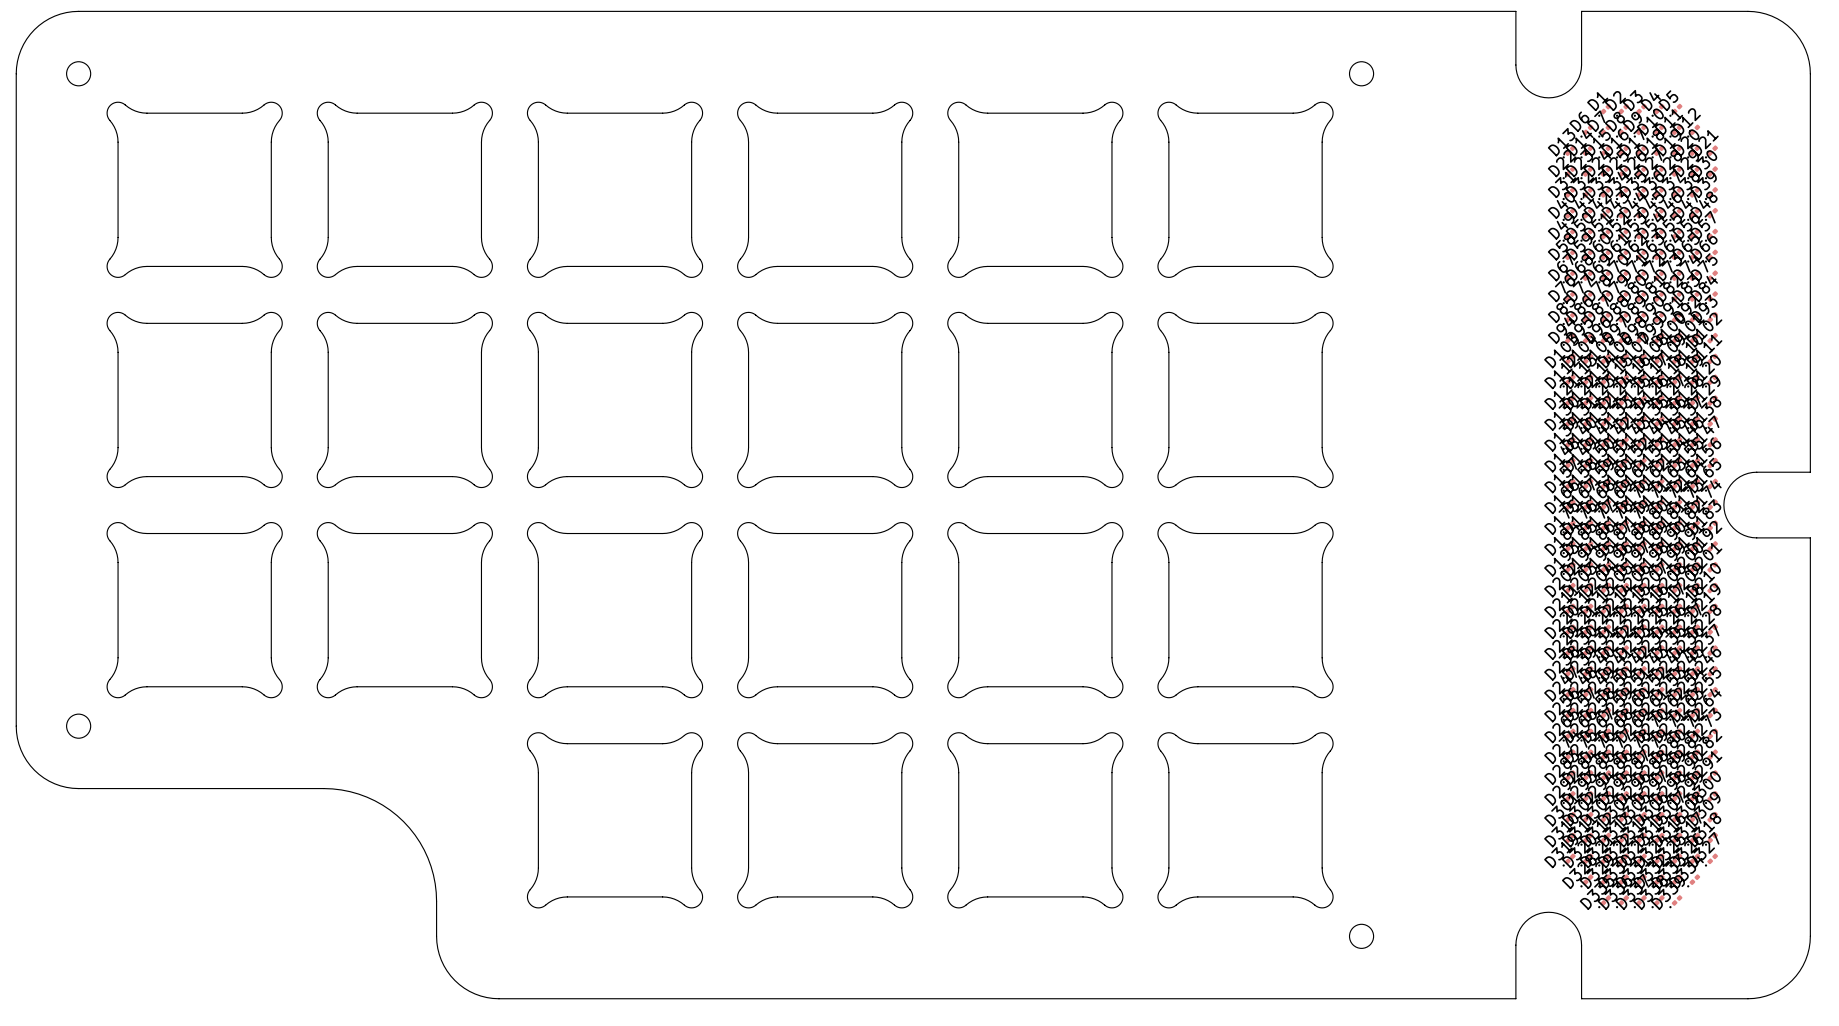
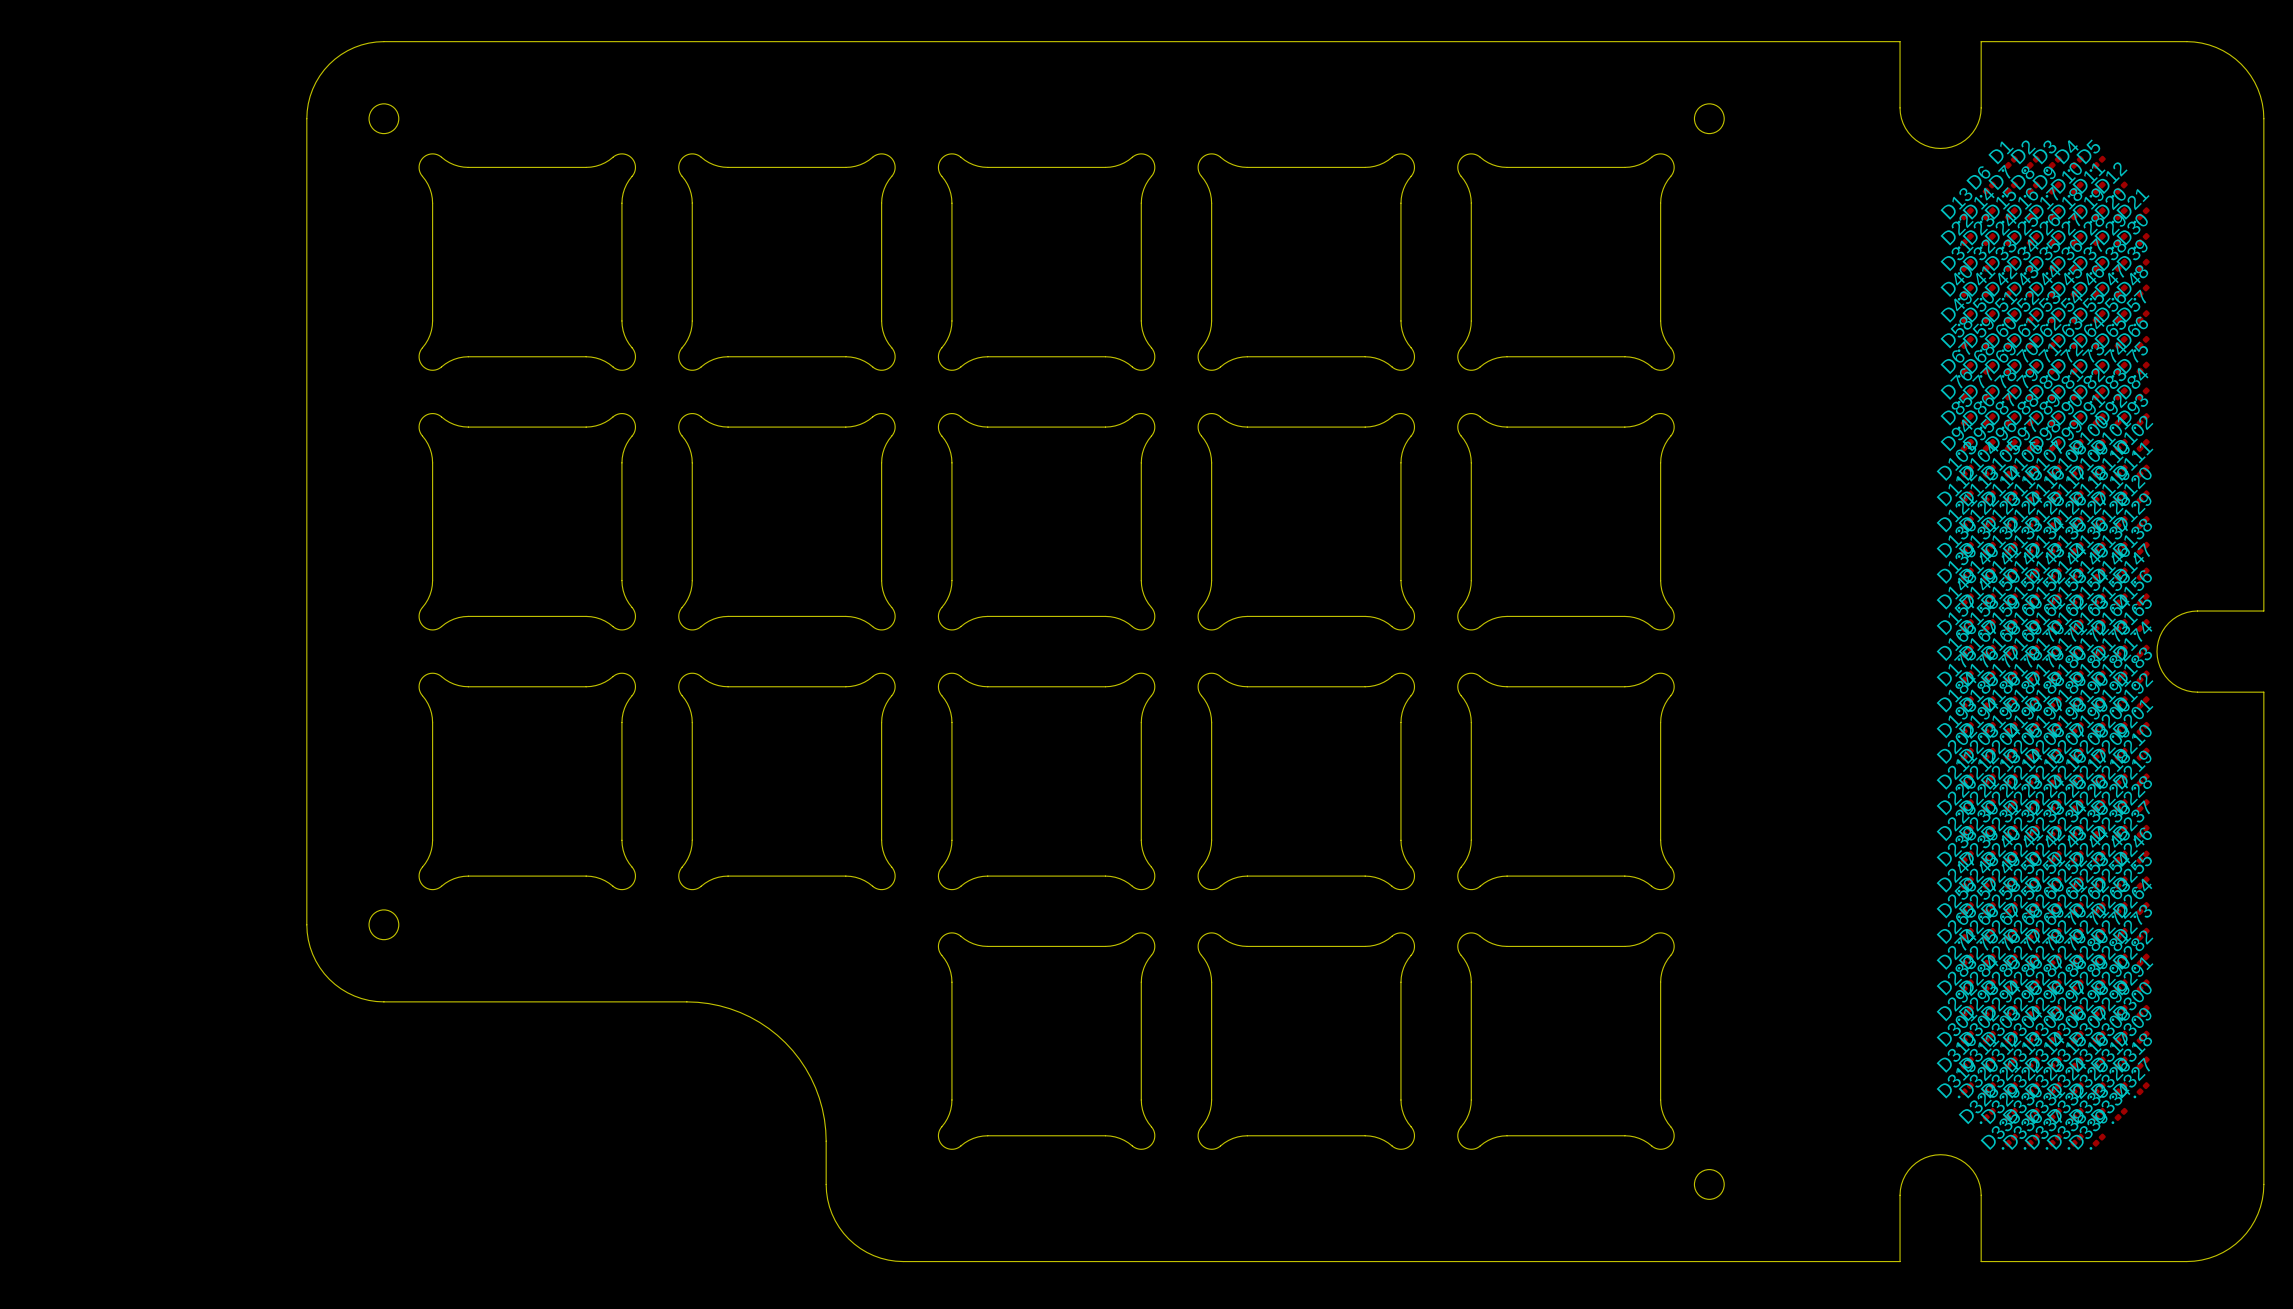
board edge: (288, 11) (66, 12) (49, 18) (30, 34) (20, 49) (16, 73) (16, 726) (20, 750) (26, 760) (39, 774) (54, 783) (72, 788) (288, 788) -> (383, 41) (354, 47) (329, 64) (312, 89) (306, 118) (307, 932) (315, 961) (335, 984) (361, 998) (383, 1001)
round board edge position: (78, 73) -> (383, 118)
board edge: (125, 104) (135, 111) (147, 113) (242, 113) (253, 111) (268, 102) (279, 105) (281, 115) (273, 130) (271, 142) (271, 237) (273, 249) (281, 264) (279, 274) (268, 277) (253, 268) (242, 266) (147, 266) (135, 268) (120, 277) (110, 274) (107, 264) (115, 249) (118, 237) (118, 142) (115, 130) (107, 112) (109, 106) (113, 103) (120, 102) (125, 104) -> none
board edge: (125, 315) (120, 312) (113, 313) (109, 316) (107, 323) (115, 340) (118, 352) (118, 447) (115, 459) (107, 474) (110, 484) (120, 487) (135, 478) (147, 476) (242, 476) (253, 478) (268, 487) (279, 484) (281, 474) (273, 459) (271, 447) (271, 352) (273, 340) (281, 325) (279, 315) (268, 312) (253, 321) (242, 323) (147, 323) (135, 321) (125, 315) -> none
board edge: (125, 525) (135, 531) (147, 533) (242, 533) (253, 531) (268, 522) (279, 525) (281, 535) (273, 550) (271, 562) (271, 657) (273, 669) (281, 684) (279, 694) (268, 697) (253, 688) (242, 686) (147, 686) (135, 688) (120, 697) (110, 694) (107, 684) (115, 669) (118, 657) (118, 562) (115, 550) (107, 533) (109, 526) (113, 523) (119, 522) (125, 525) -> none
round board edge position: (78, 726) -> (383, 924)
board edge: (545, 735) (540, 733) (534, 733) (528, 738) (527, 743) (536, 761) (538, 772) (538, 867) (536, 879) (527, 894) (530, 904) (540, 907) (555, 899) (567, 896) (662, 896) (674, 899) (689, 907) (699, 904) (702, 894) (693, 879) (691, 867) (691, 772) (693, 761) (702, 746) (699, 735) (689, 733) (674, 741) (662, 743) (567, 743) (555, 741) (545, 735) -> none
board edge: (323, 788) (350, 791) (375, 800) (397, 815) (415, 835) (428, 858) (433, 874) (436, 892) (436, 942) (439, 954) (450, 975) (469, 991) (480, 996) (498, 998) (709, 998) -> (427, 1001) (697, 1002) (729, 1008) (750, 1017) (768, 1028) (792, 1050) (805, 1068) (815, 1087) (822, 1108) (825, 1130) (827, 1199) (839, 1227) (854, 1244) (866, 1252) (880, 1258) (903, 1261)

